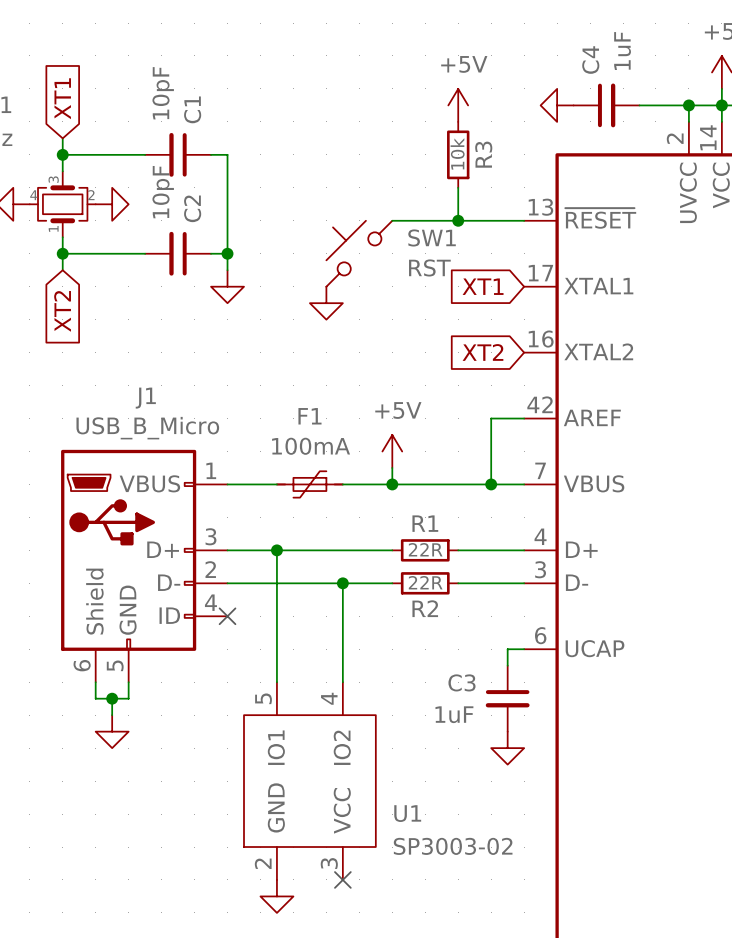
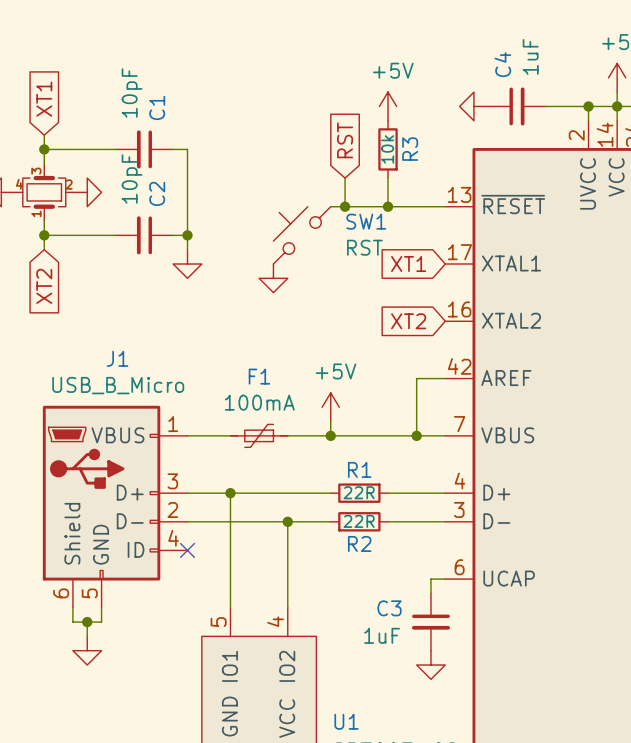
global label: none -> RST (345, 140)
wire: none -> (345, 178) (345, 206)
junction: none -> (345, 206)

